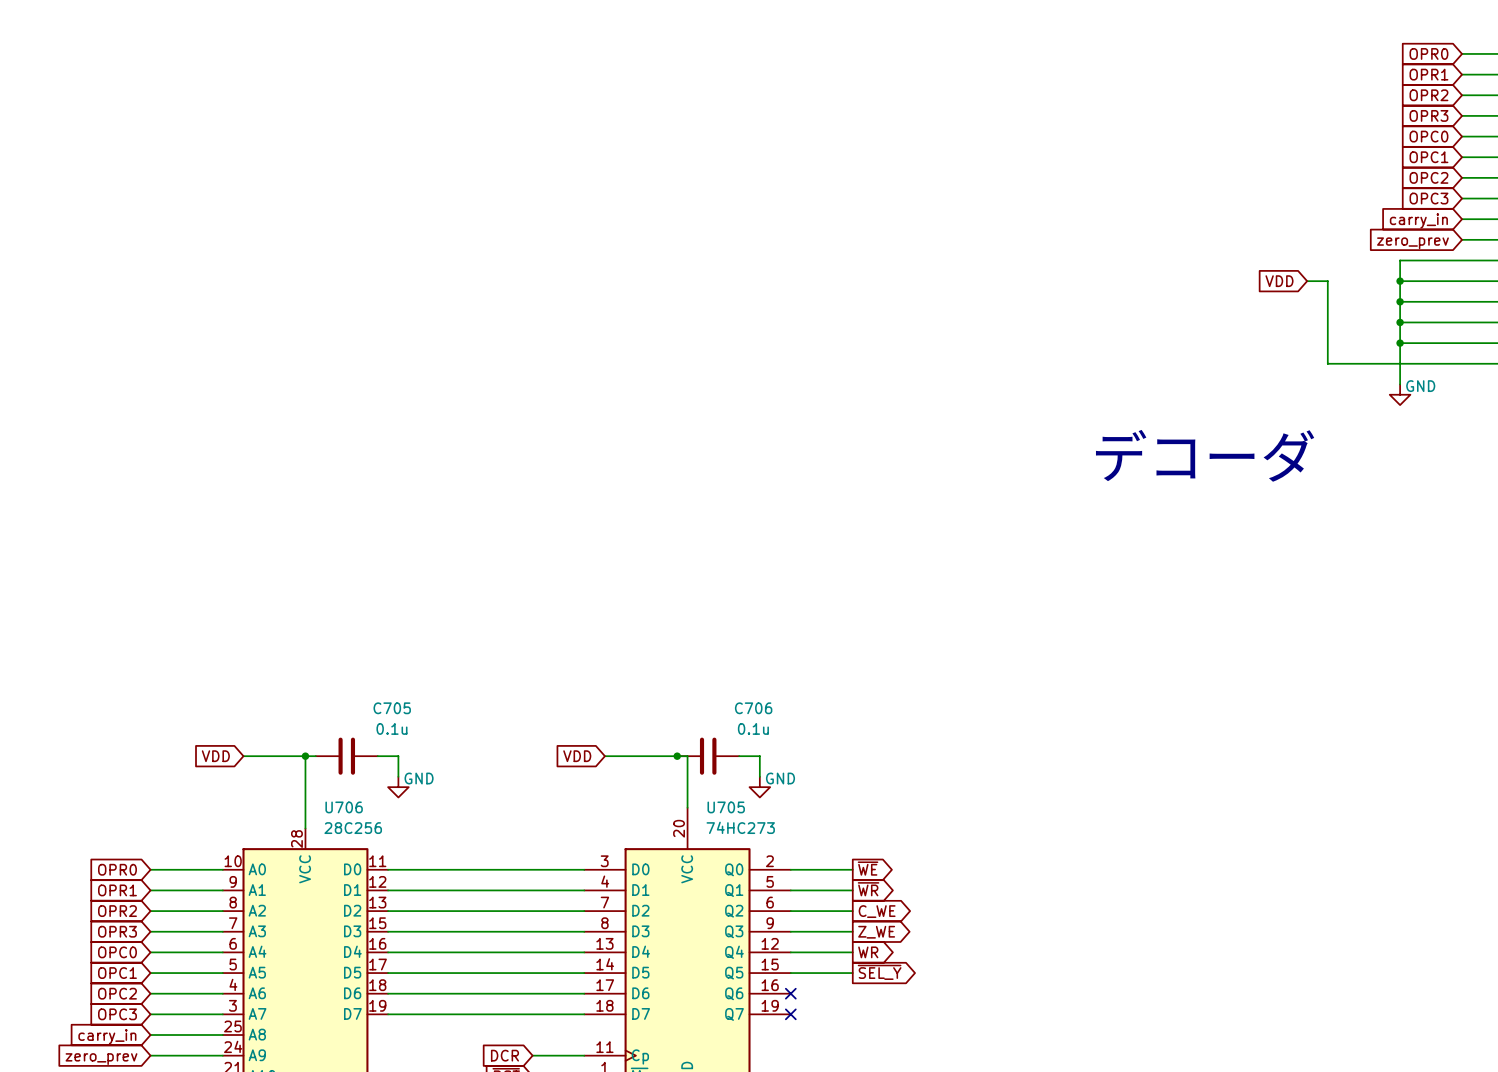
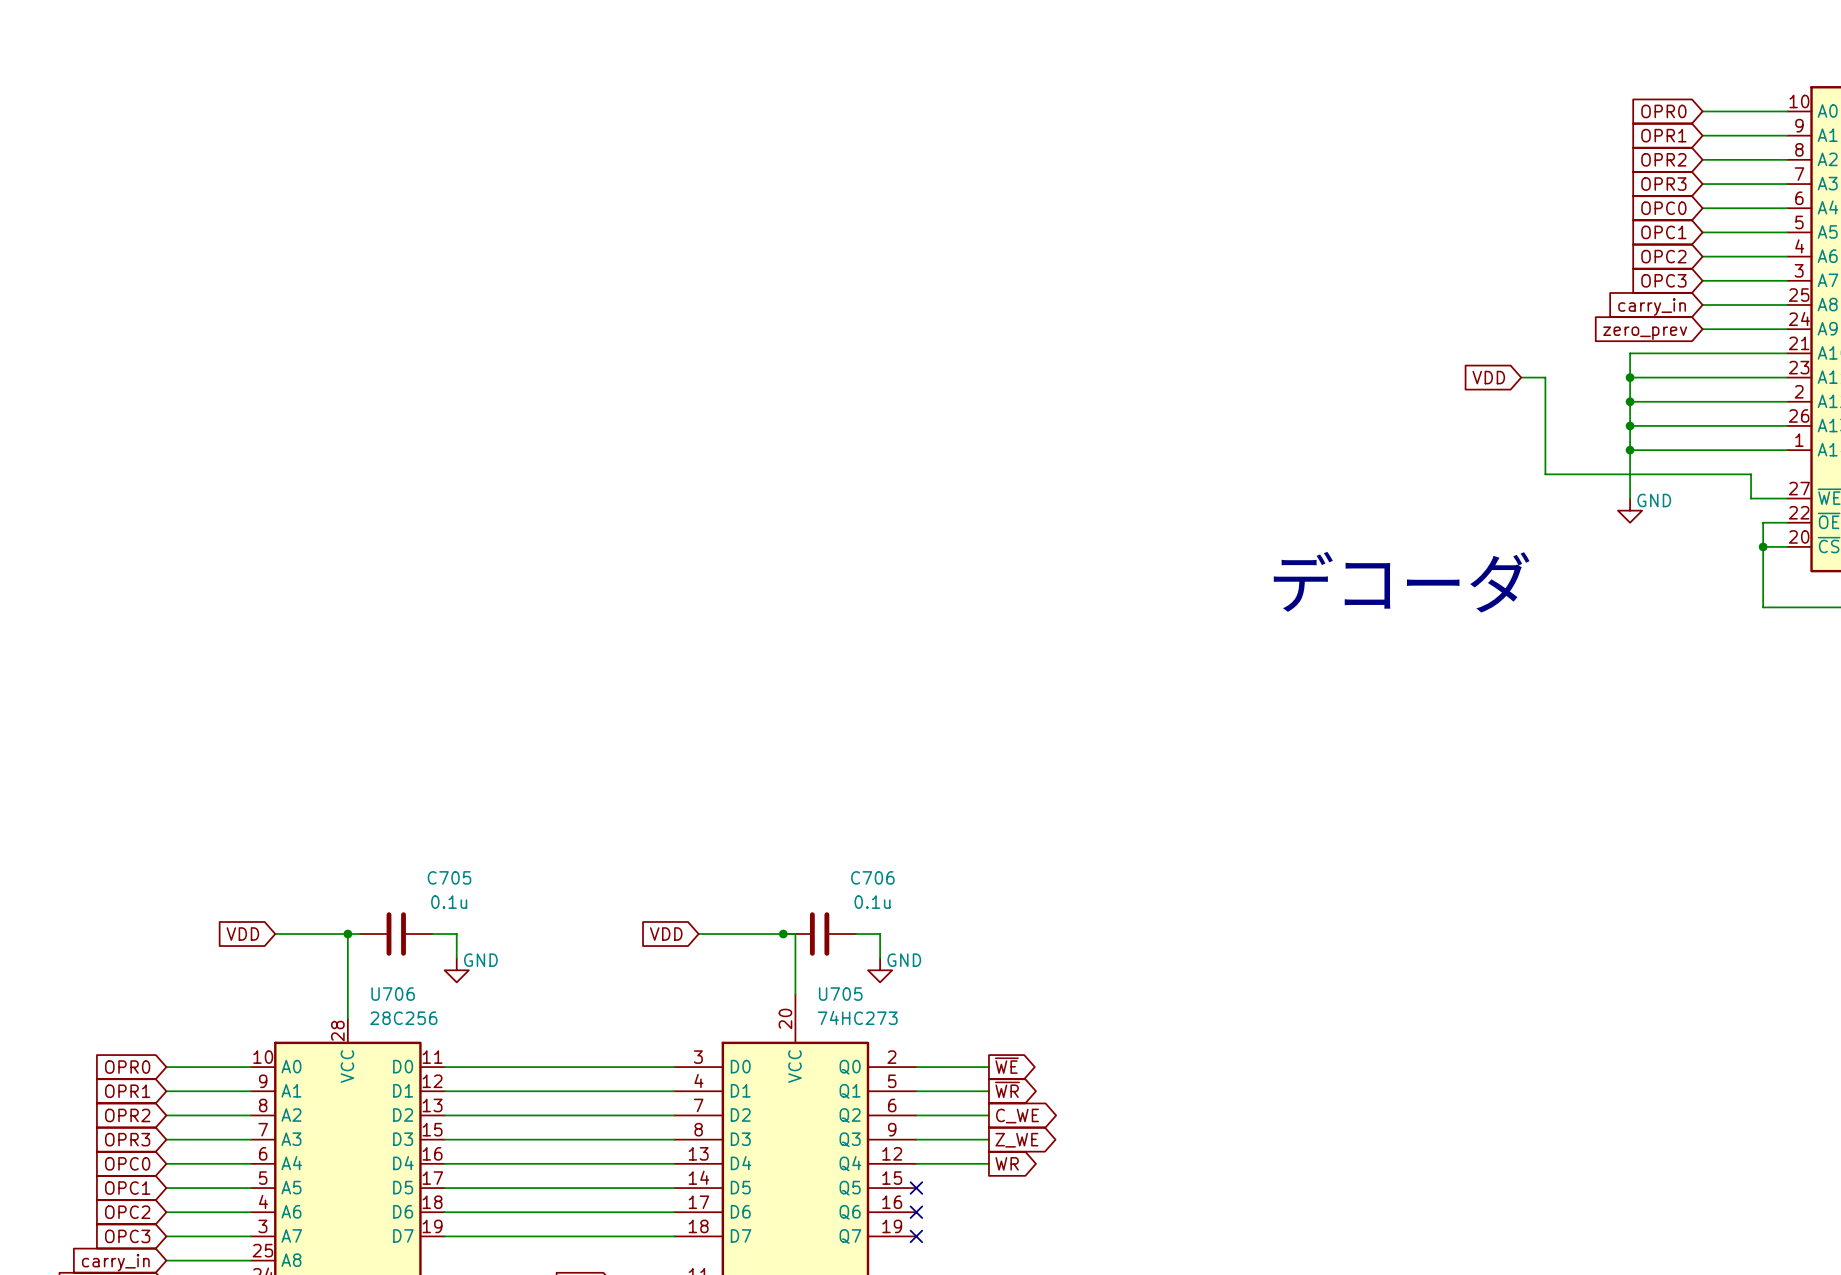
global label: ~{SEL_Y} (879, 972) -> none
wire: (790, 973) (852, 973) -> none
no-connect mark: none -> (916, 1188)

